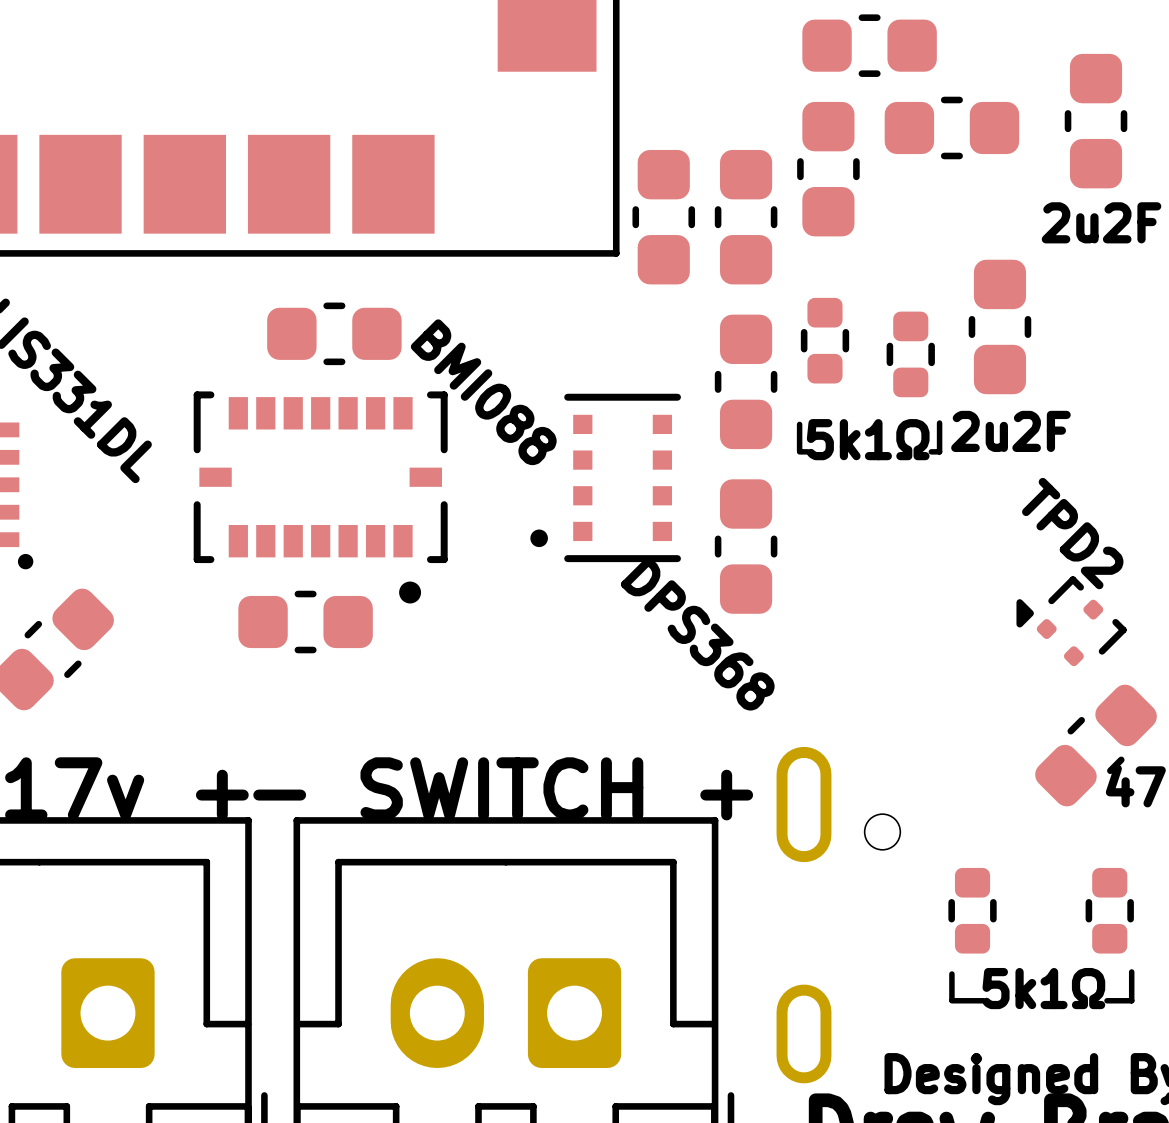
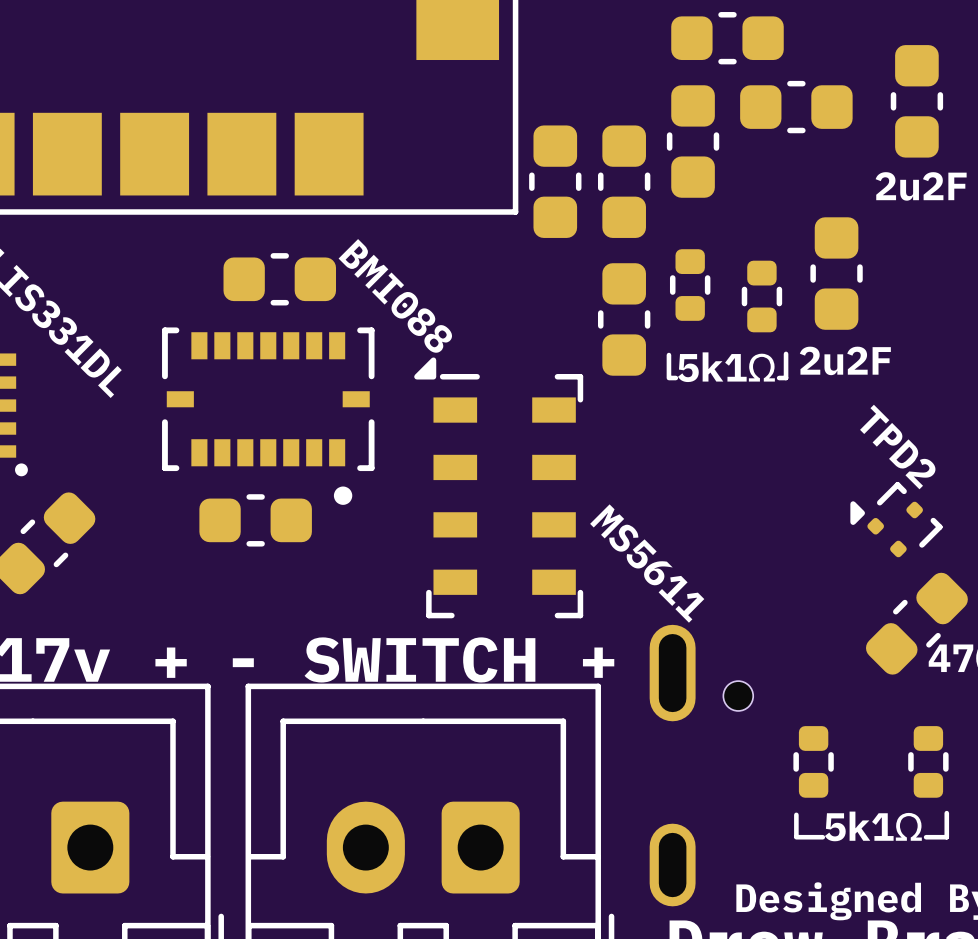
text position: BMI088 (483, 392) -> BMI088 (395, 295)
part: (605, 477) -> none
part: (746, 546) -> none
part: none -> (498, 487)
text: DPS368 (697, 633) -> none
text: none -> MS5611 (647, 563)

